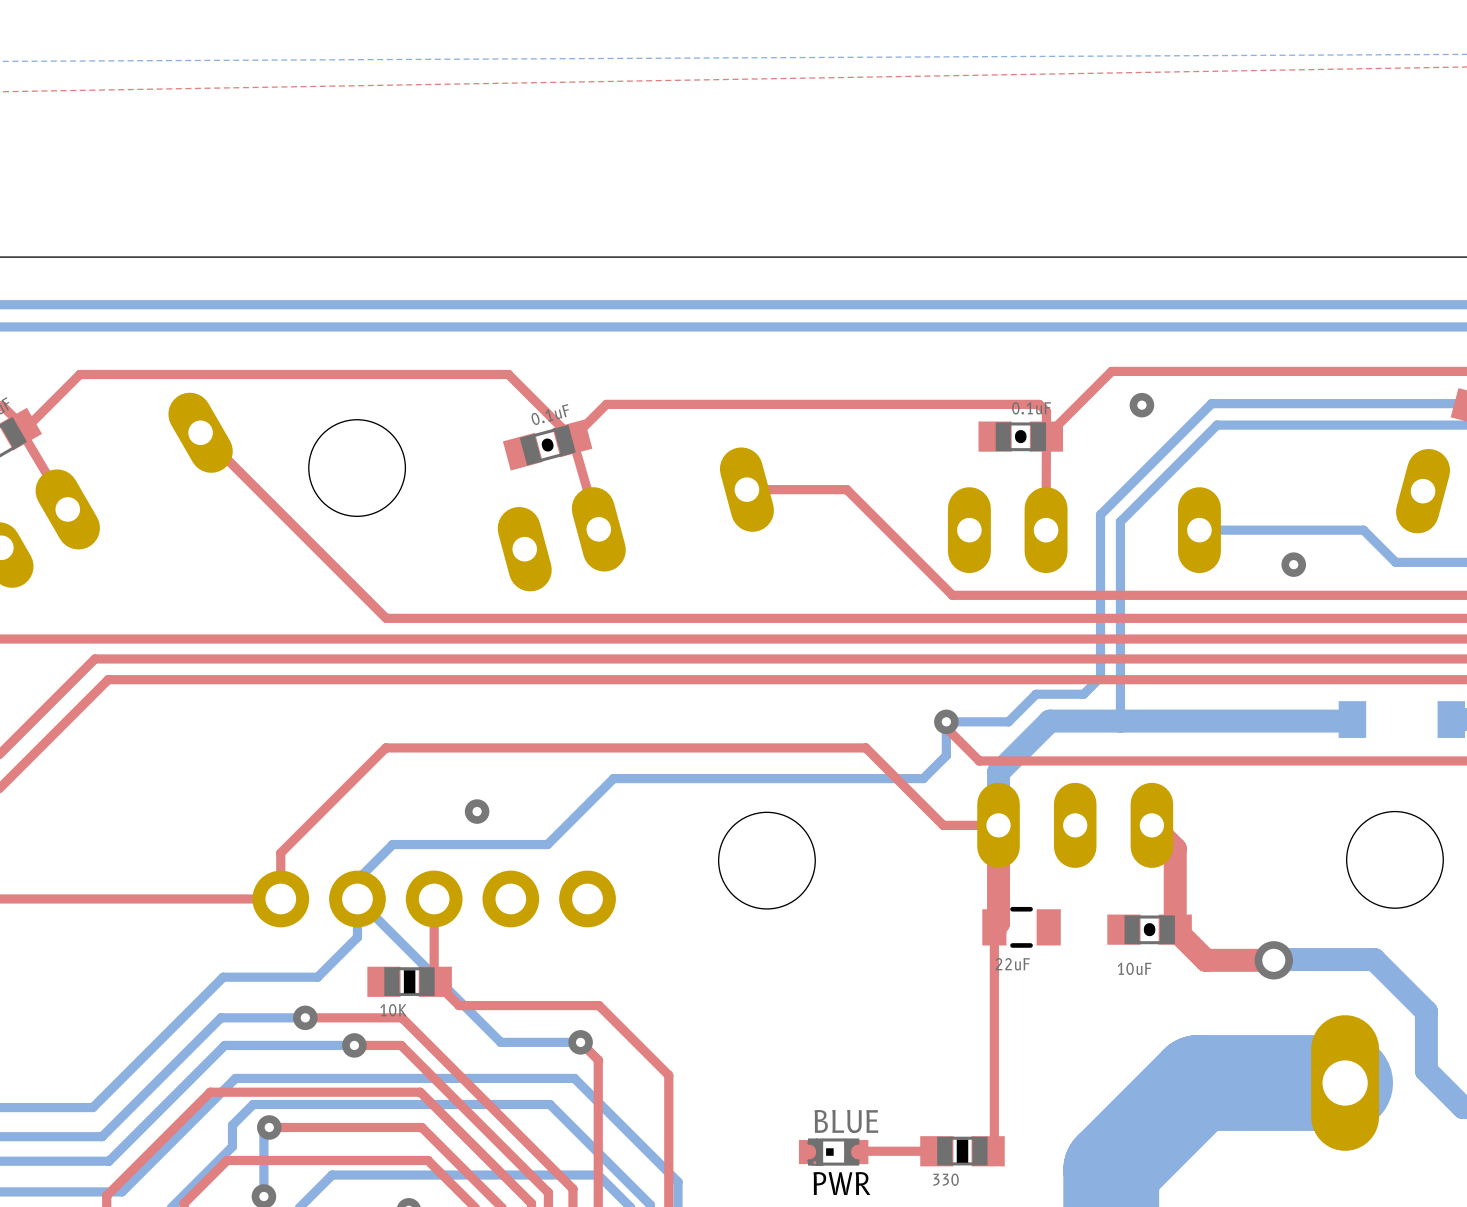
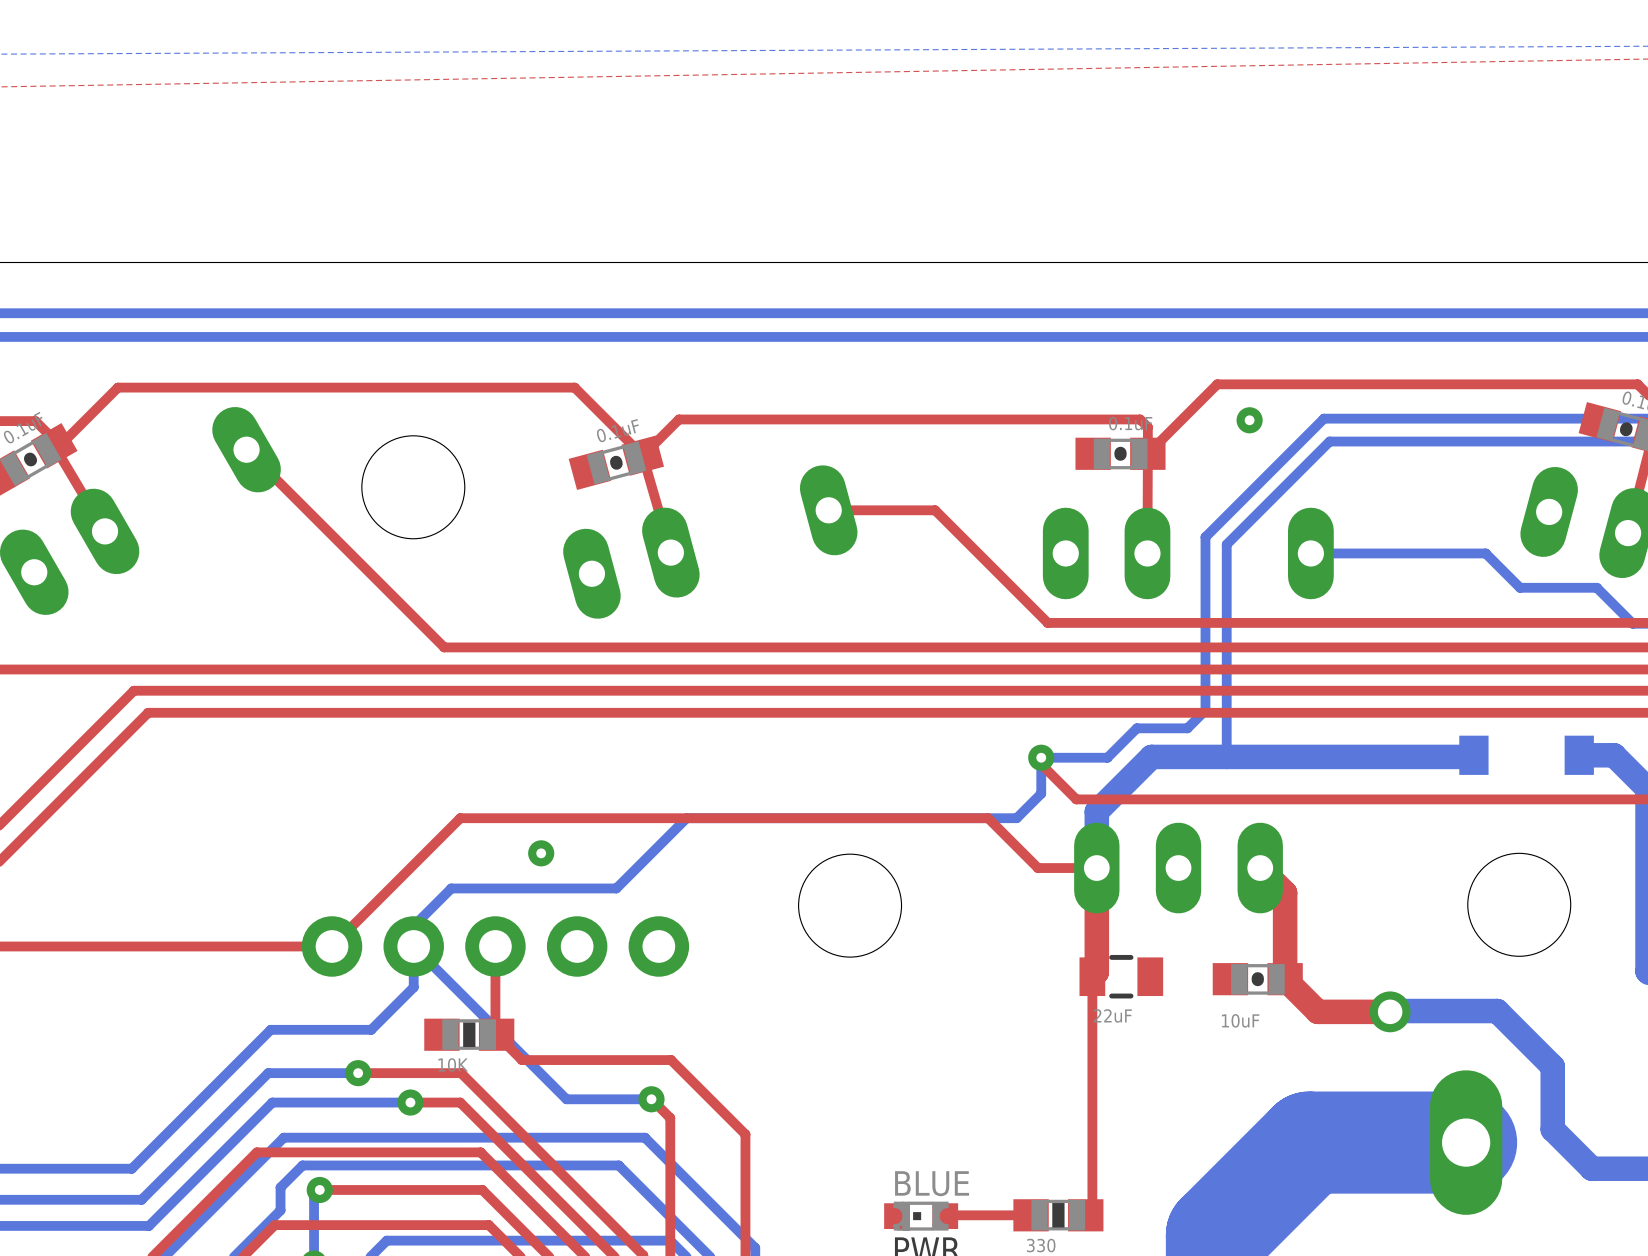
via: (1293, 564) -> none
top track: (896, 778) (865, 747) (385, 747) (280, 852) (280, 898) -> (988, 818) (460, 818) (332, 946)

